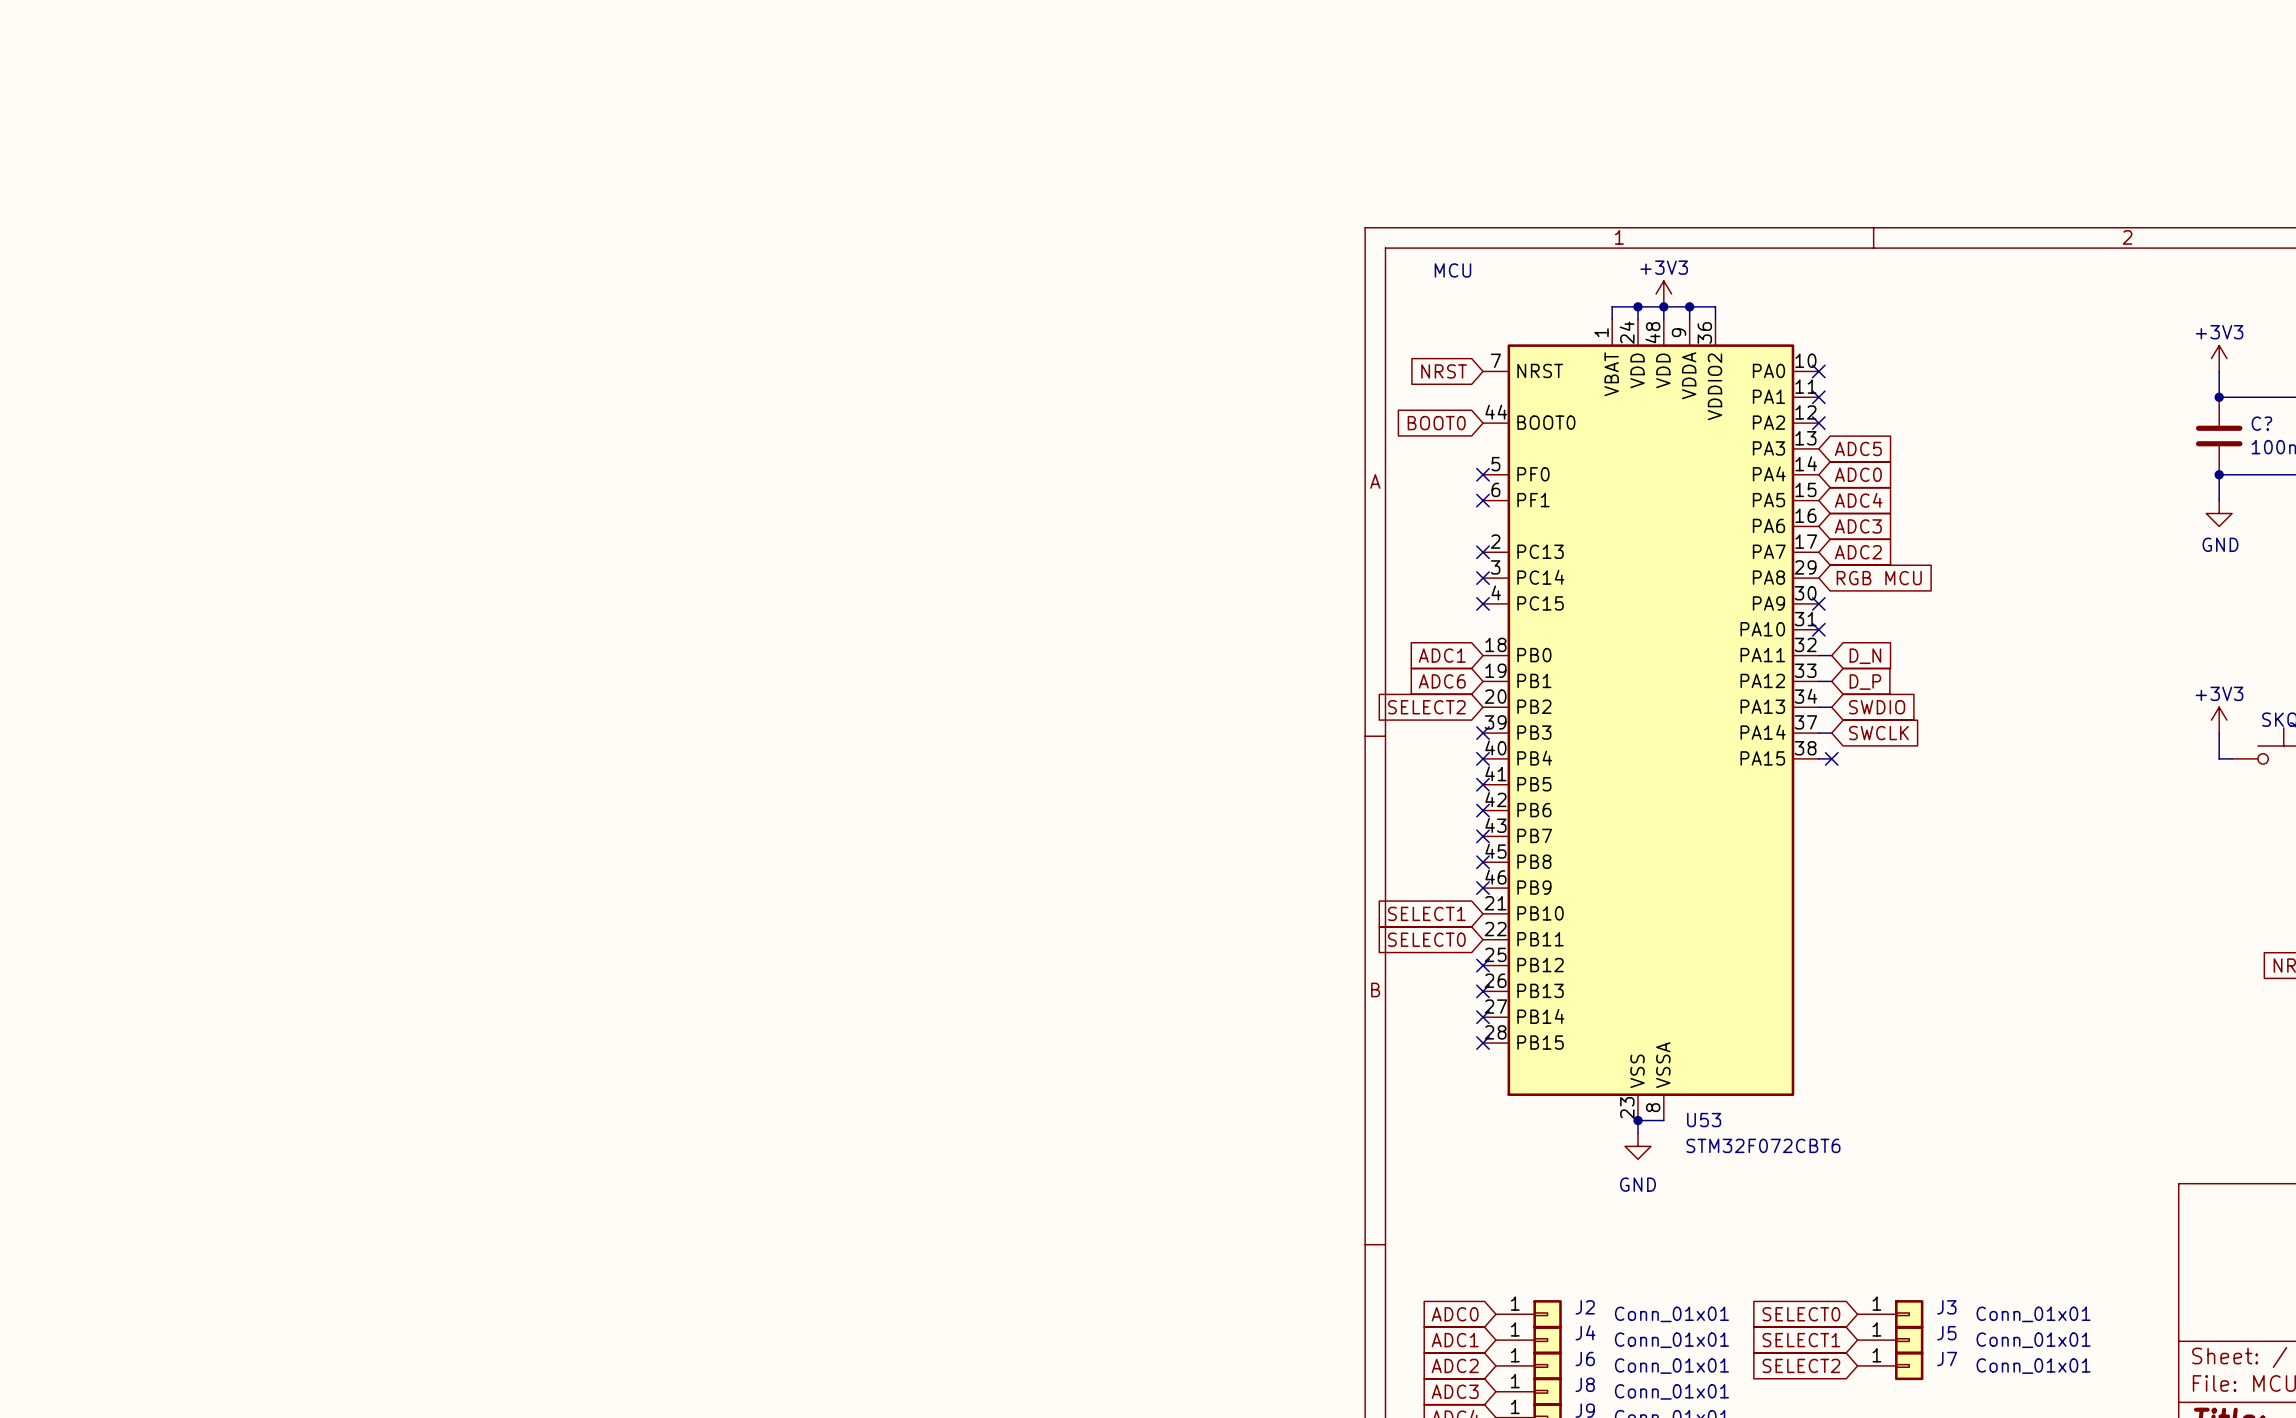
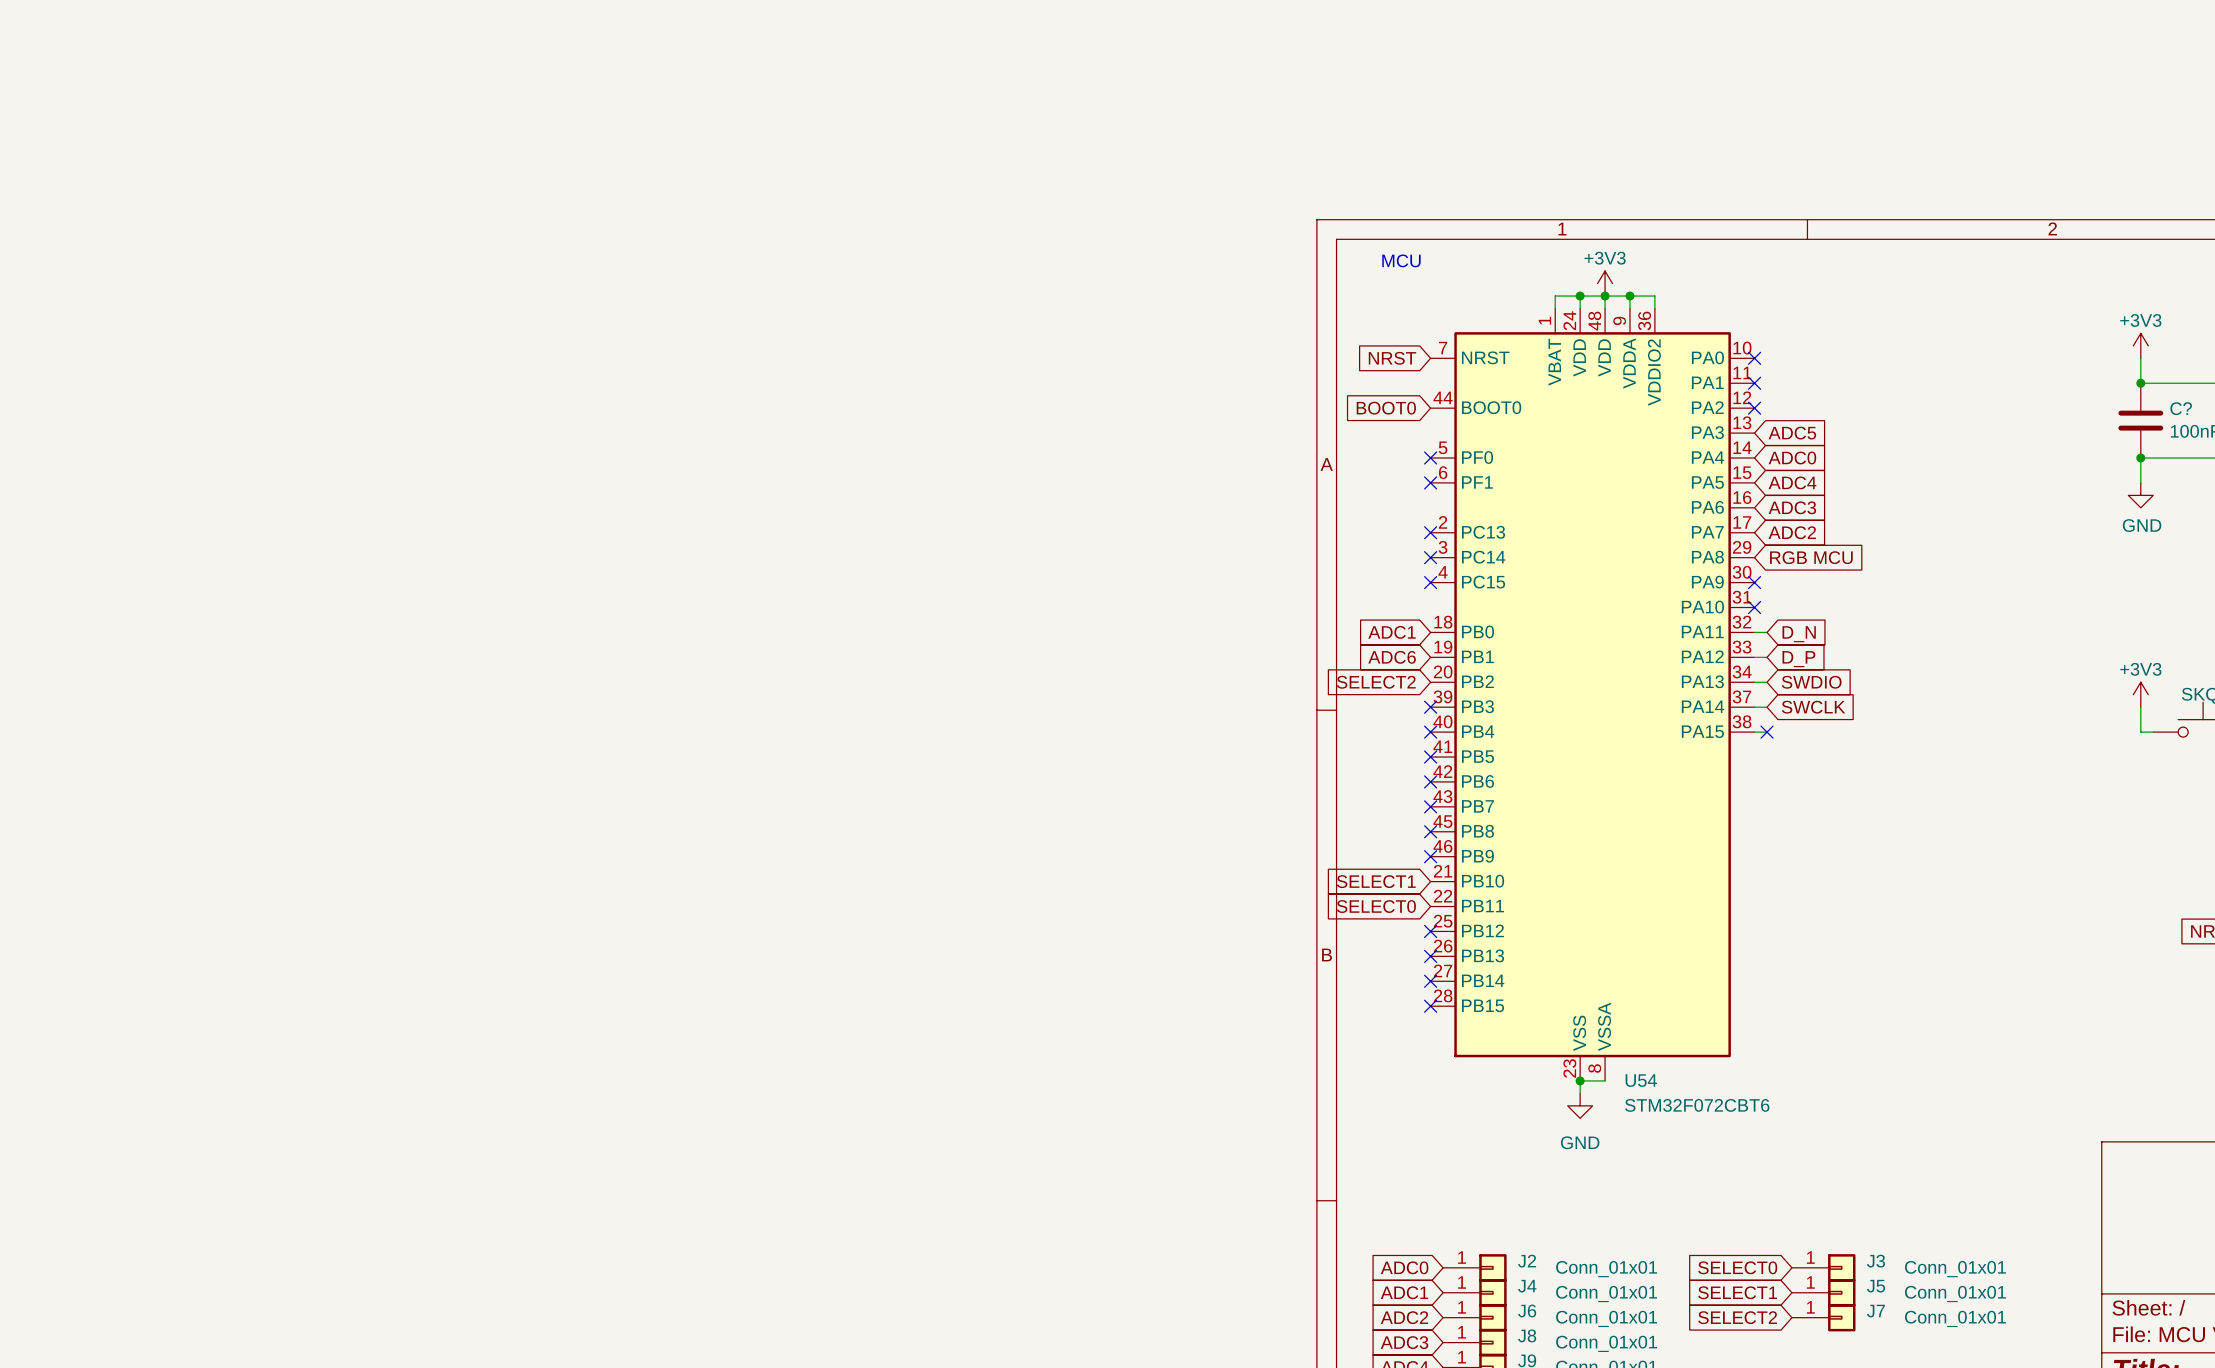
U53 name: U53 (1704, 1120) -> U54 (1641, 1080)

